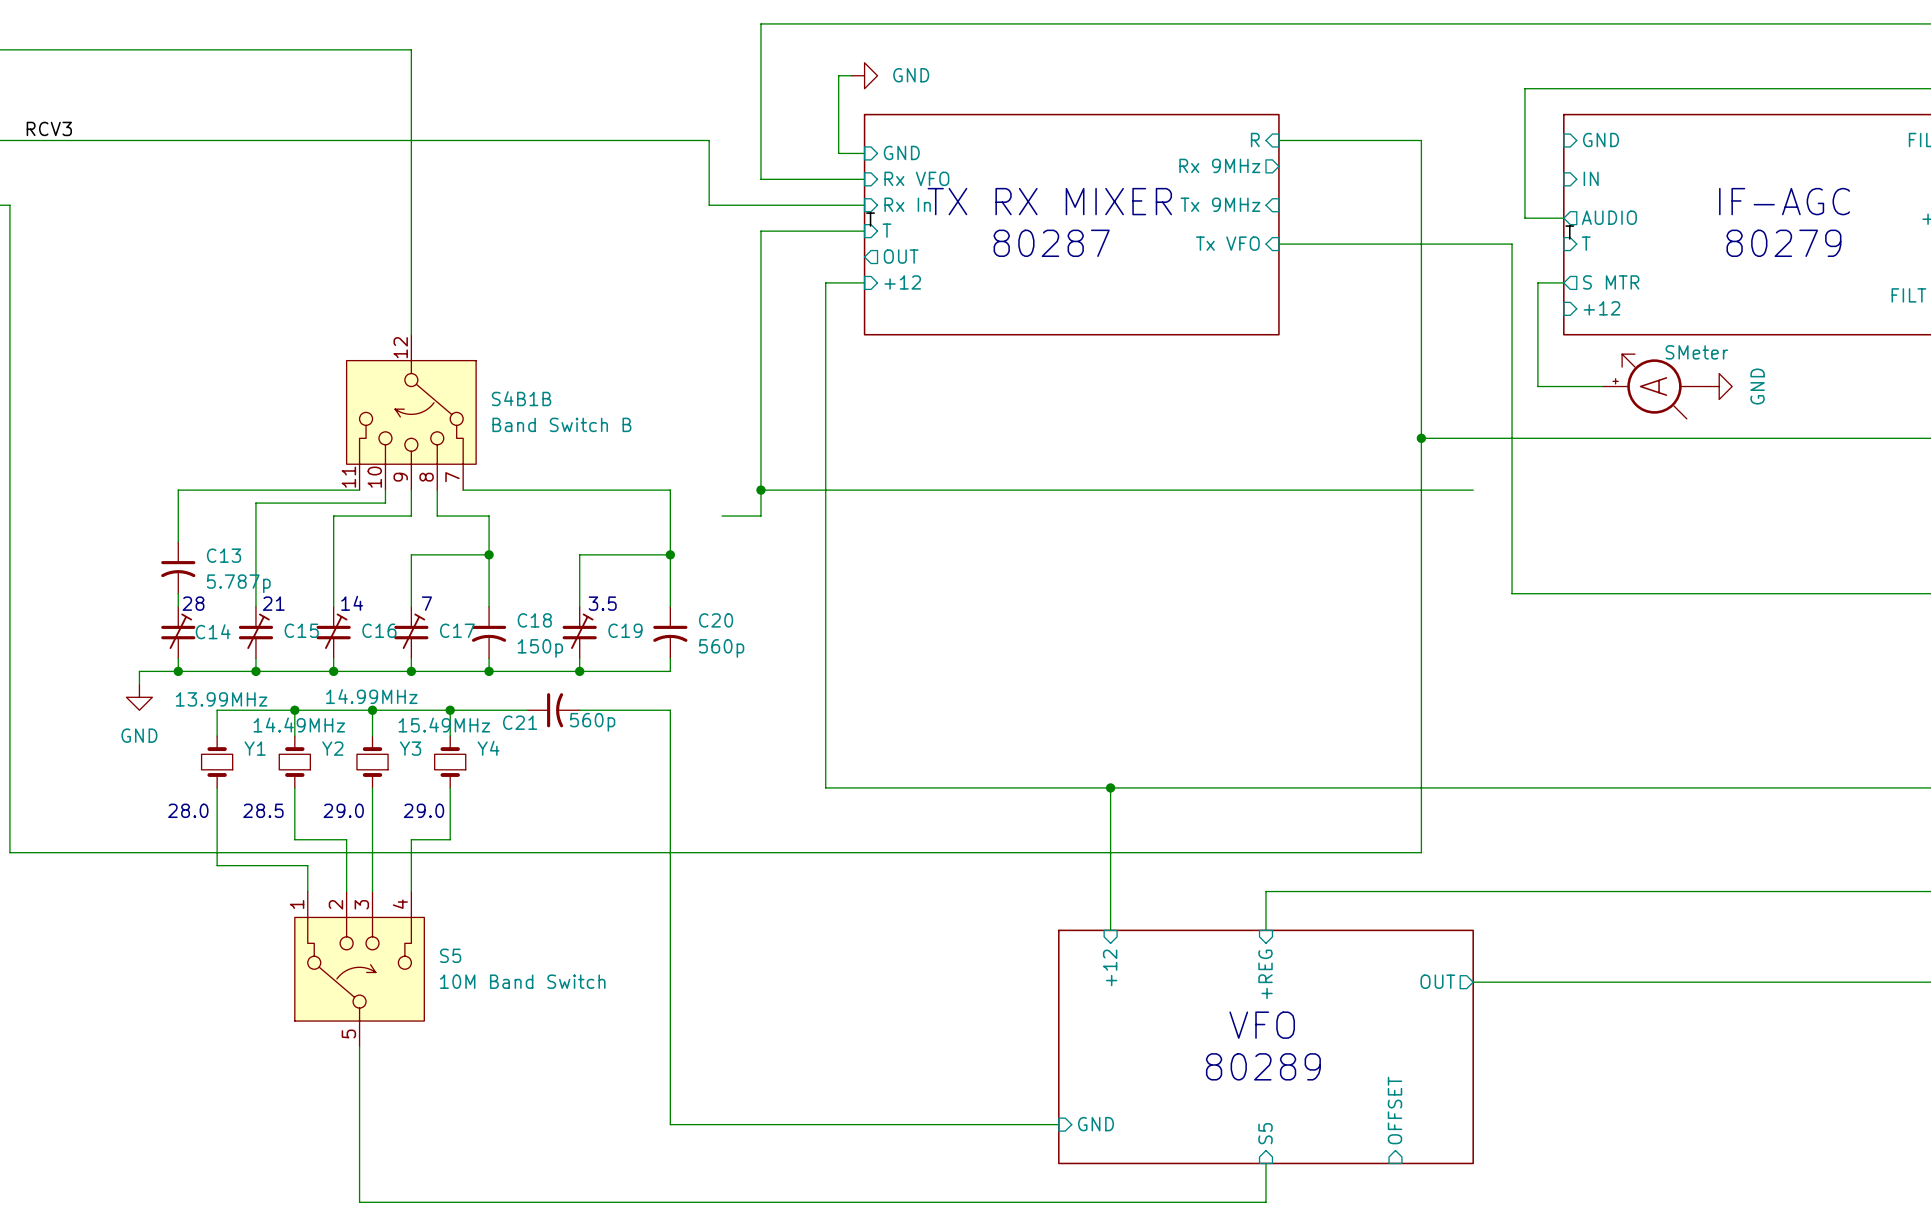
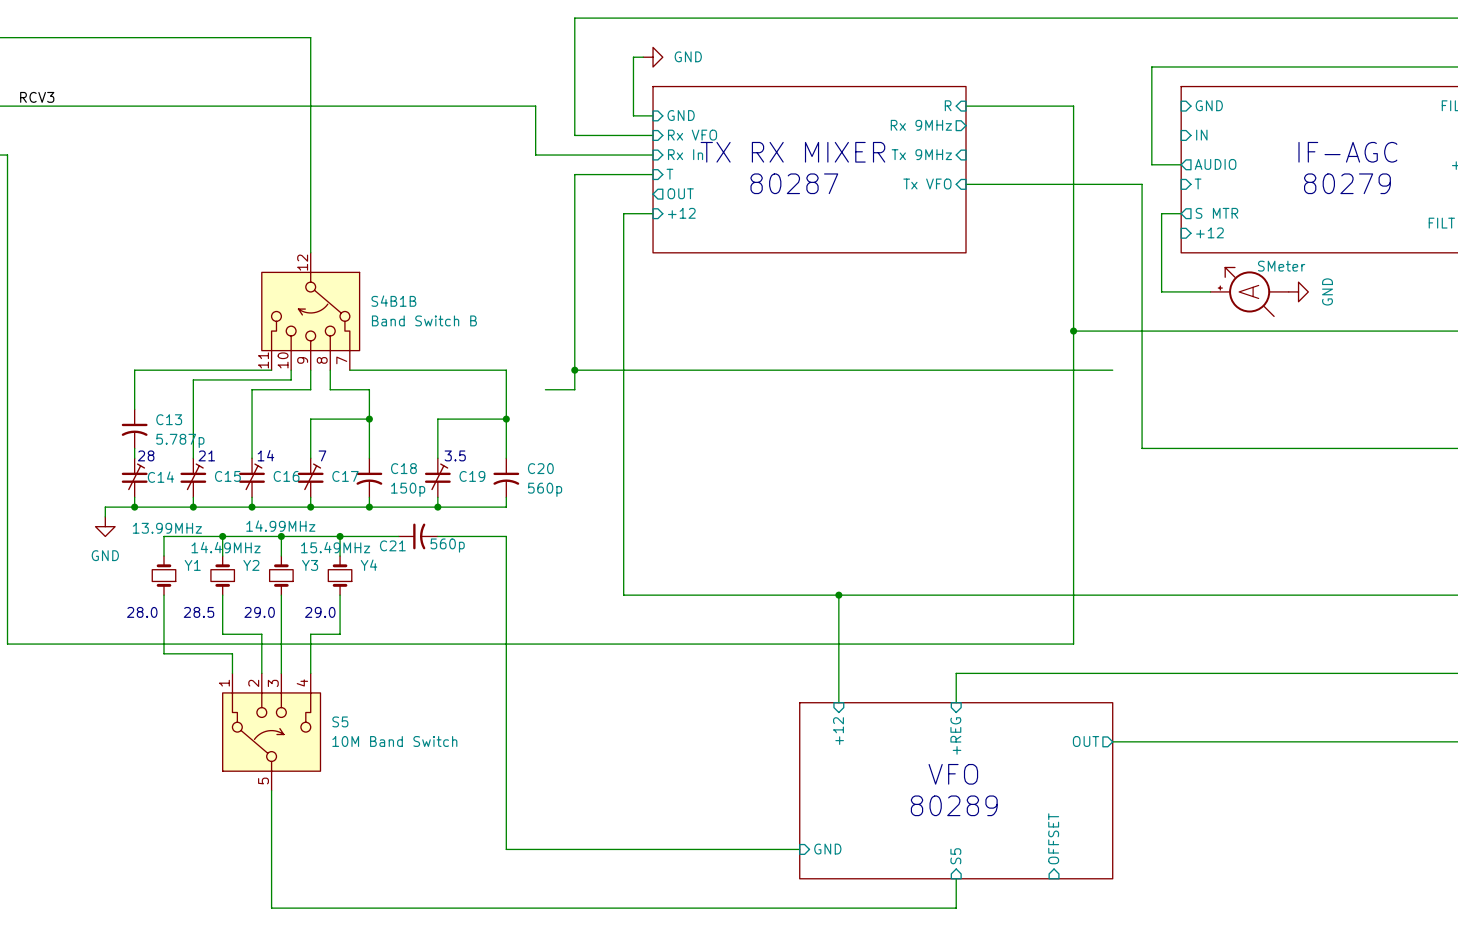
label: T (870, 219) -> none
label: T (1569, 232) -> none

